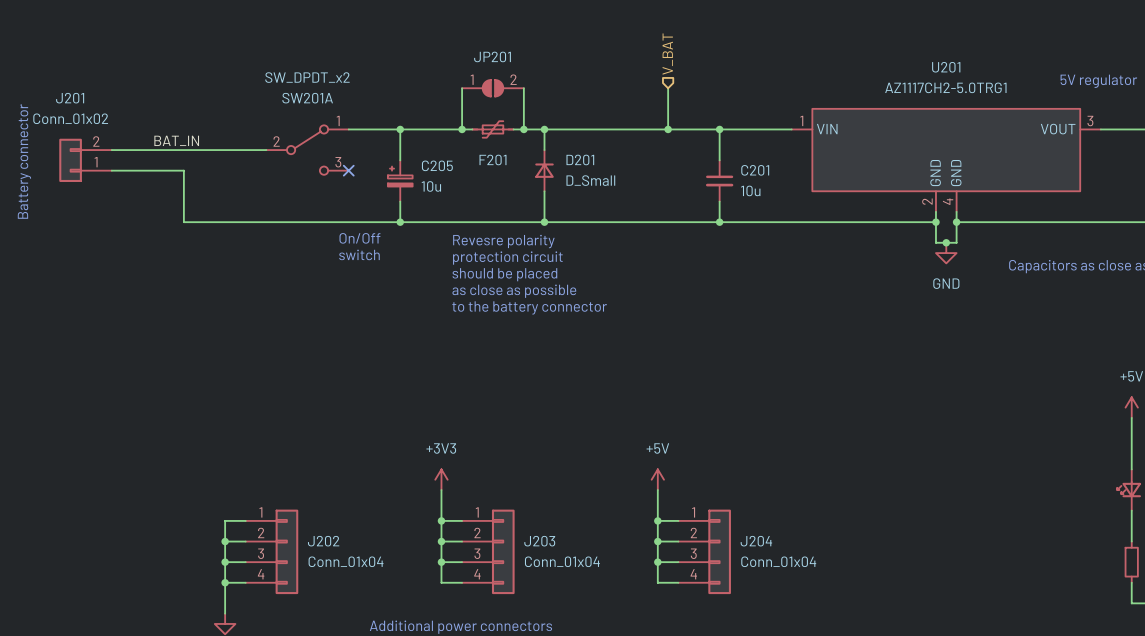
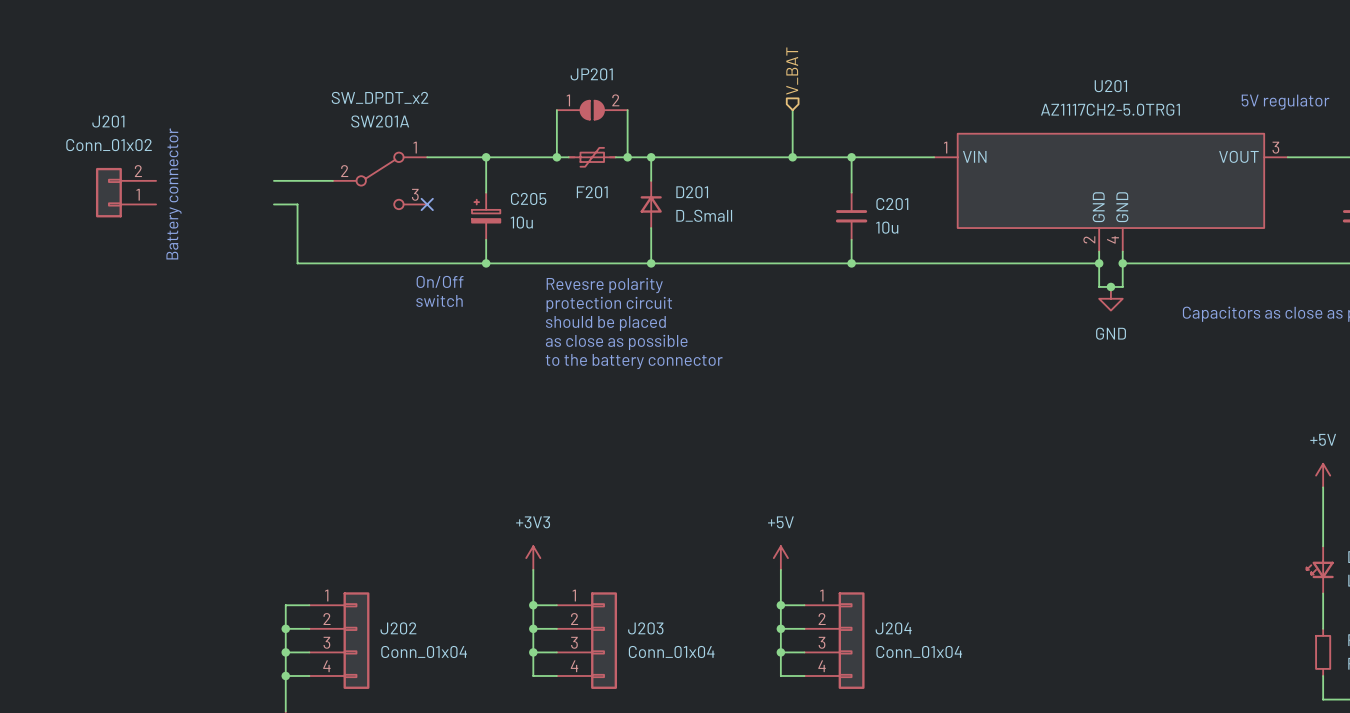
label: BAT_IN (176, 140) -> none
wire: (111, 150) (214, 150) -> none
text position: Battery connector (24, 161) -> Battery connector (174, 193)
wire: (111, 170) (183, 170) (183, 222) (235, 222) -> (273, 204) (297, 204) (297, 263)

